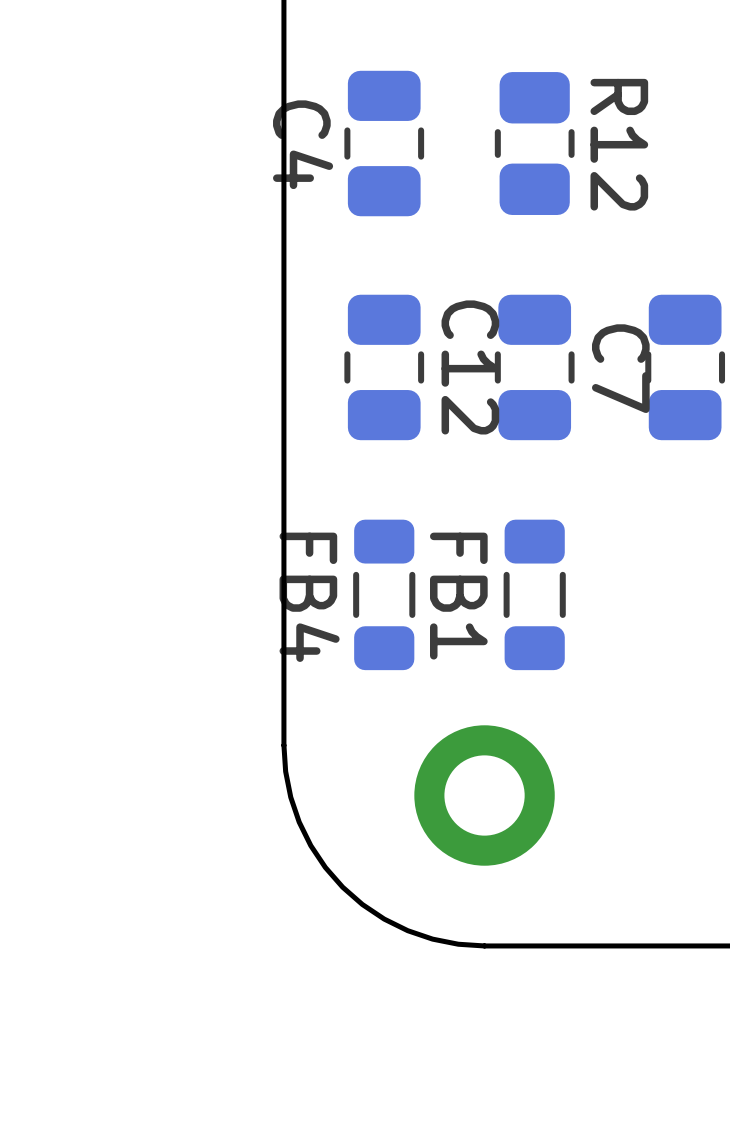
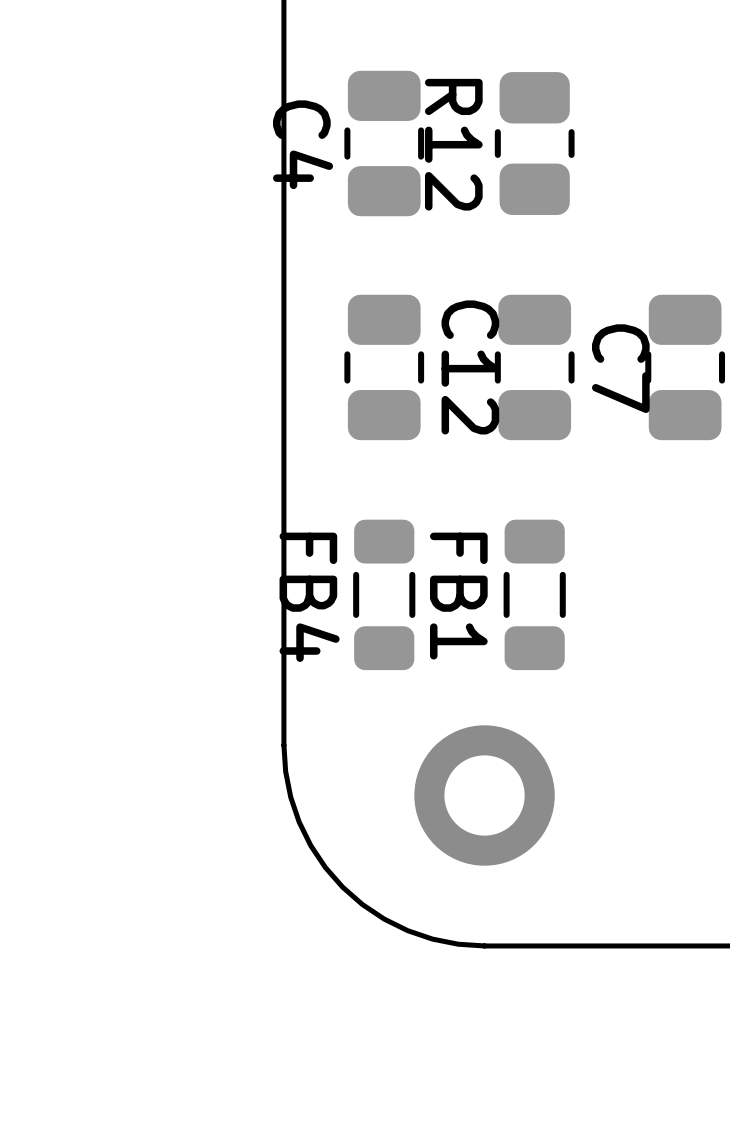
R12 name position: R12 (619, 144) -> R12 (453, 144)

